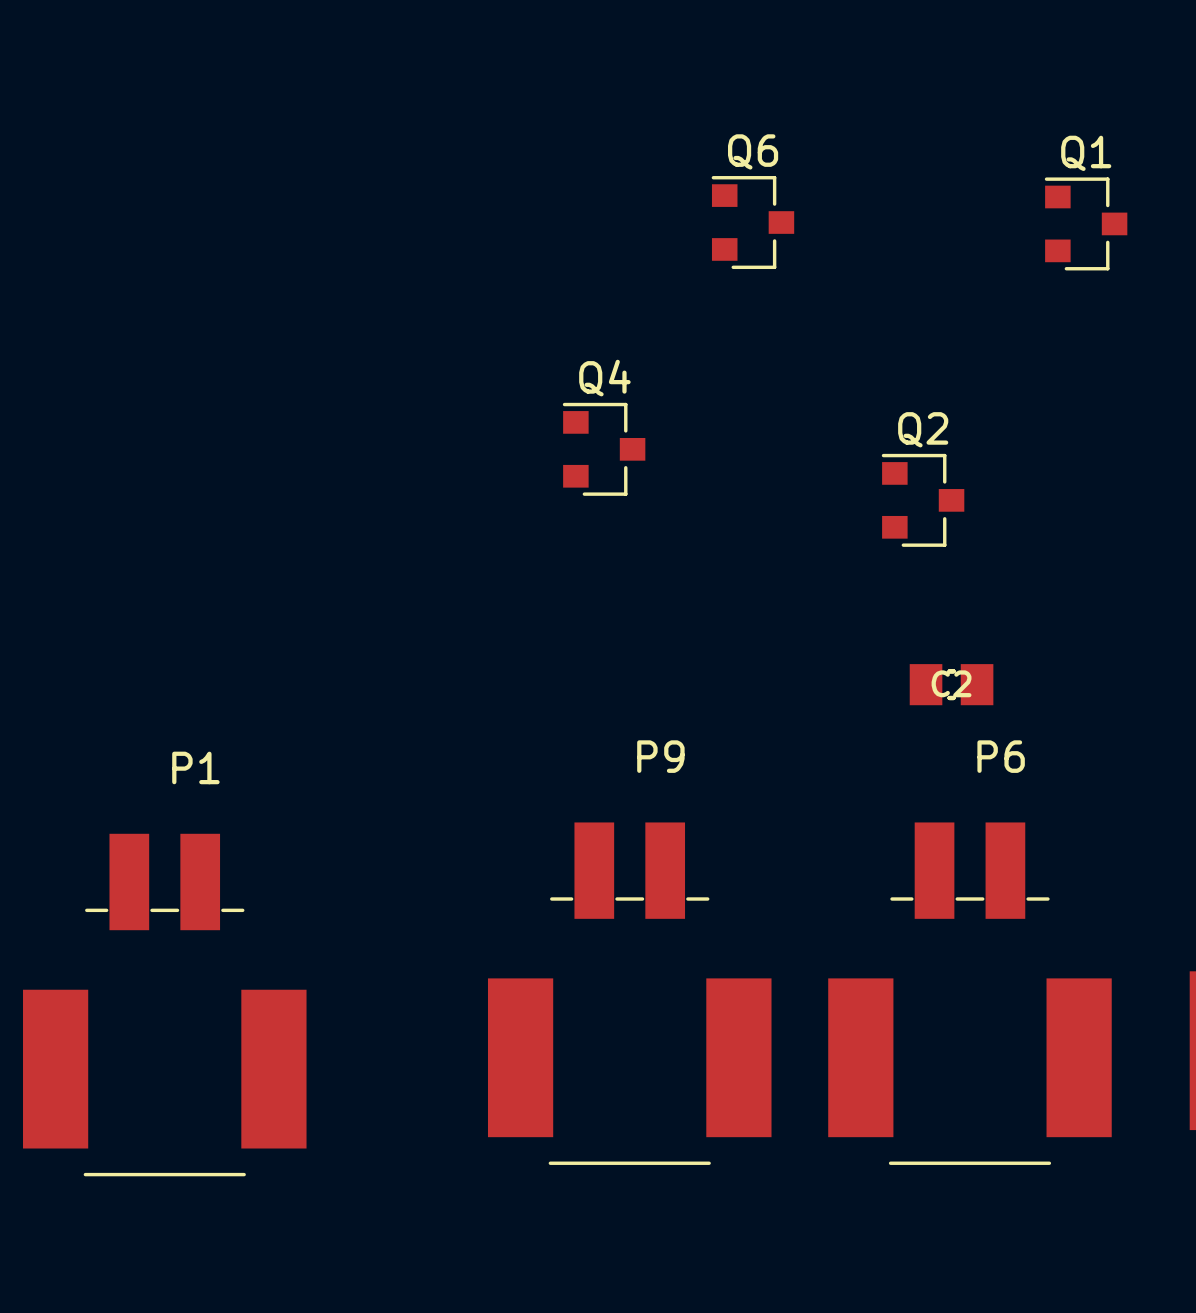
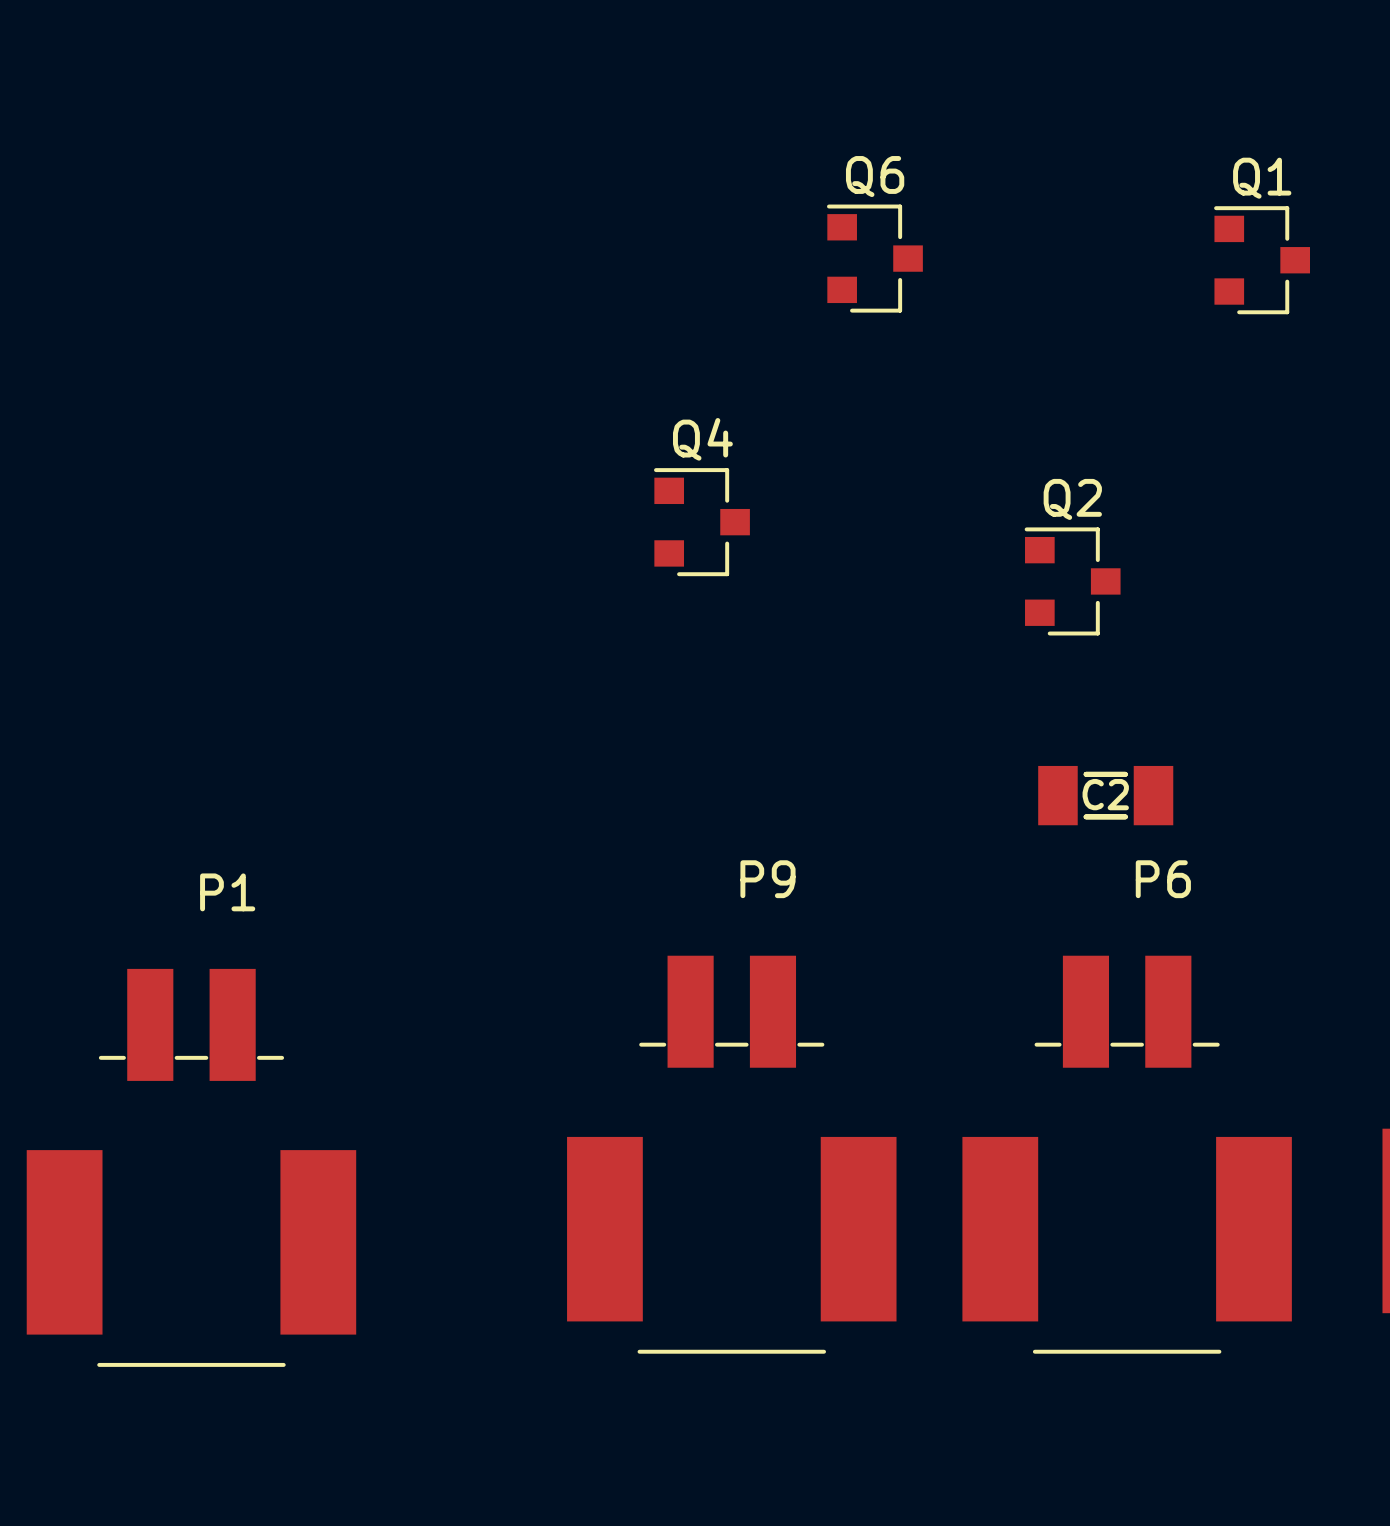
C2 footprint: [909, 664, 994, 706] -> [1038, 765, 1174, 826]

